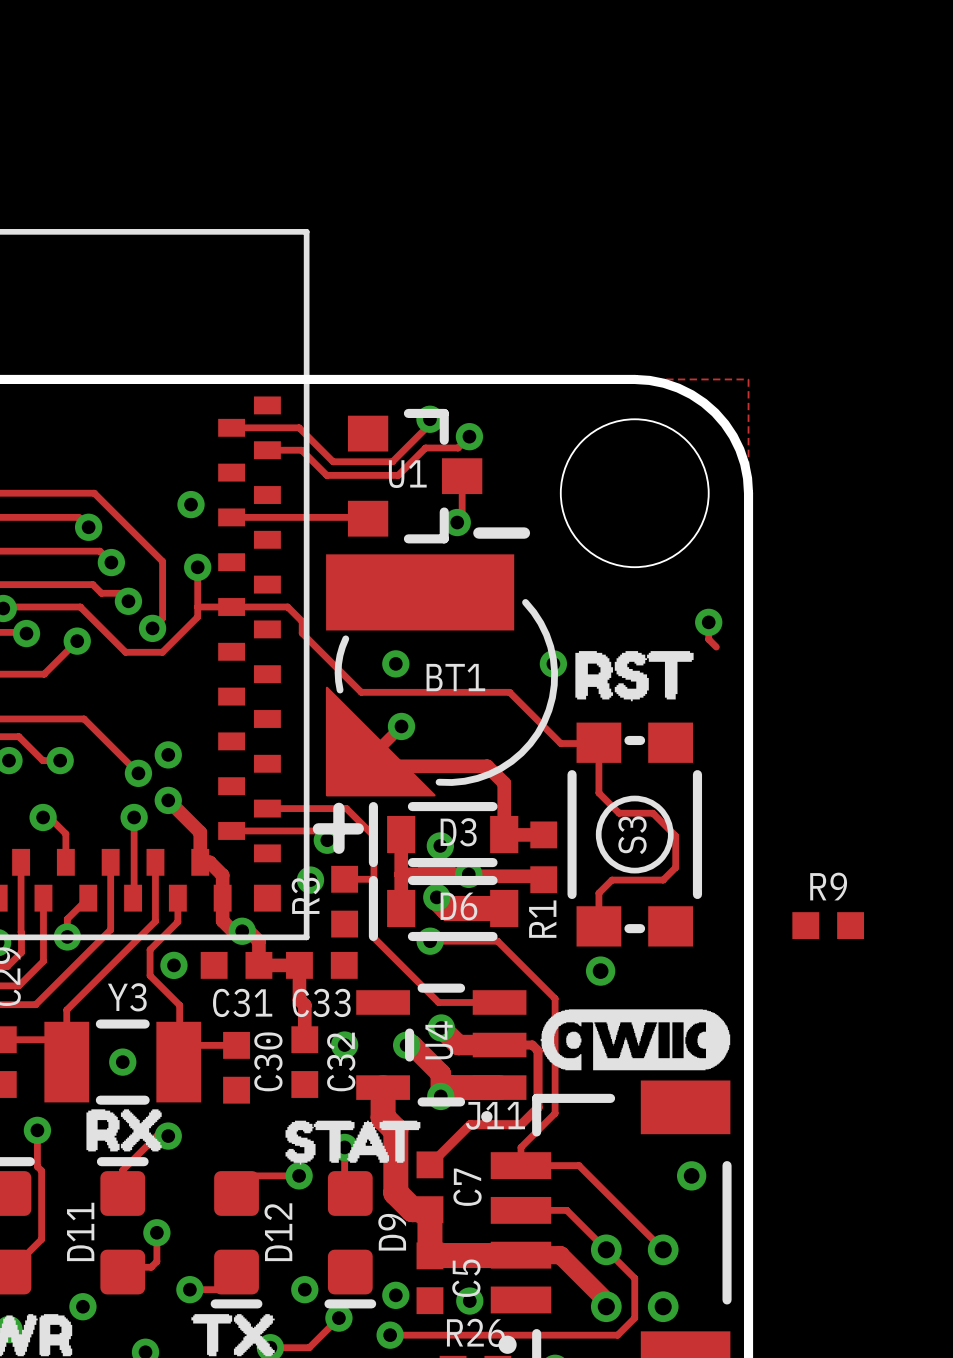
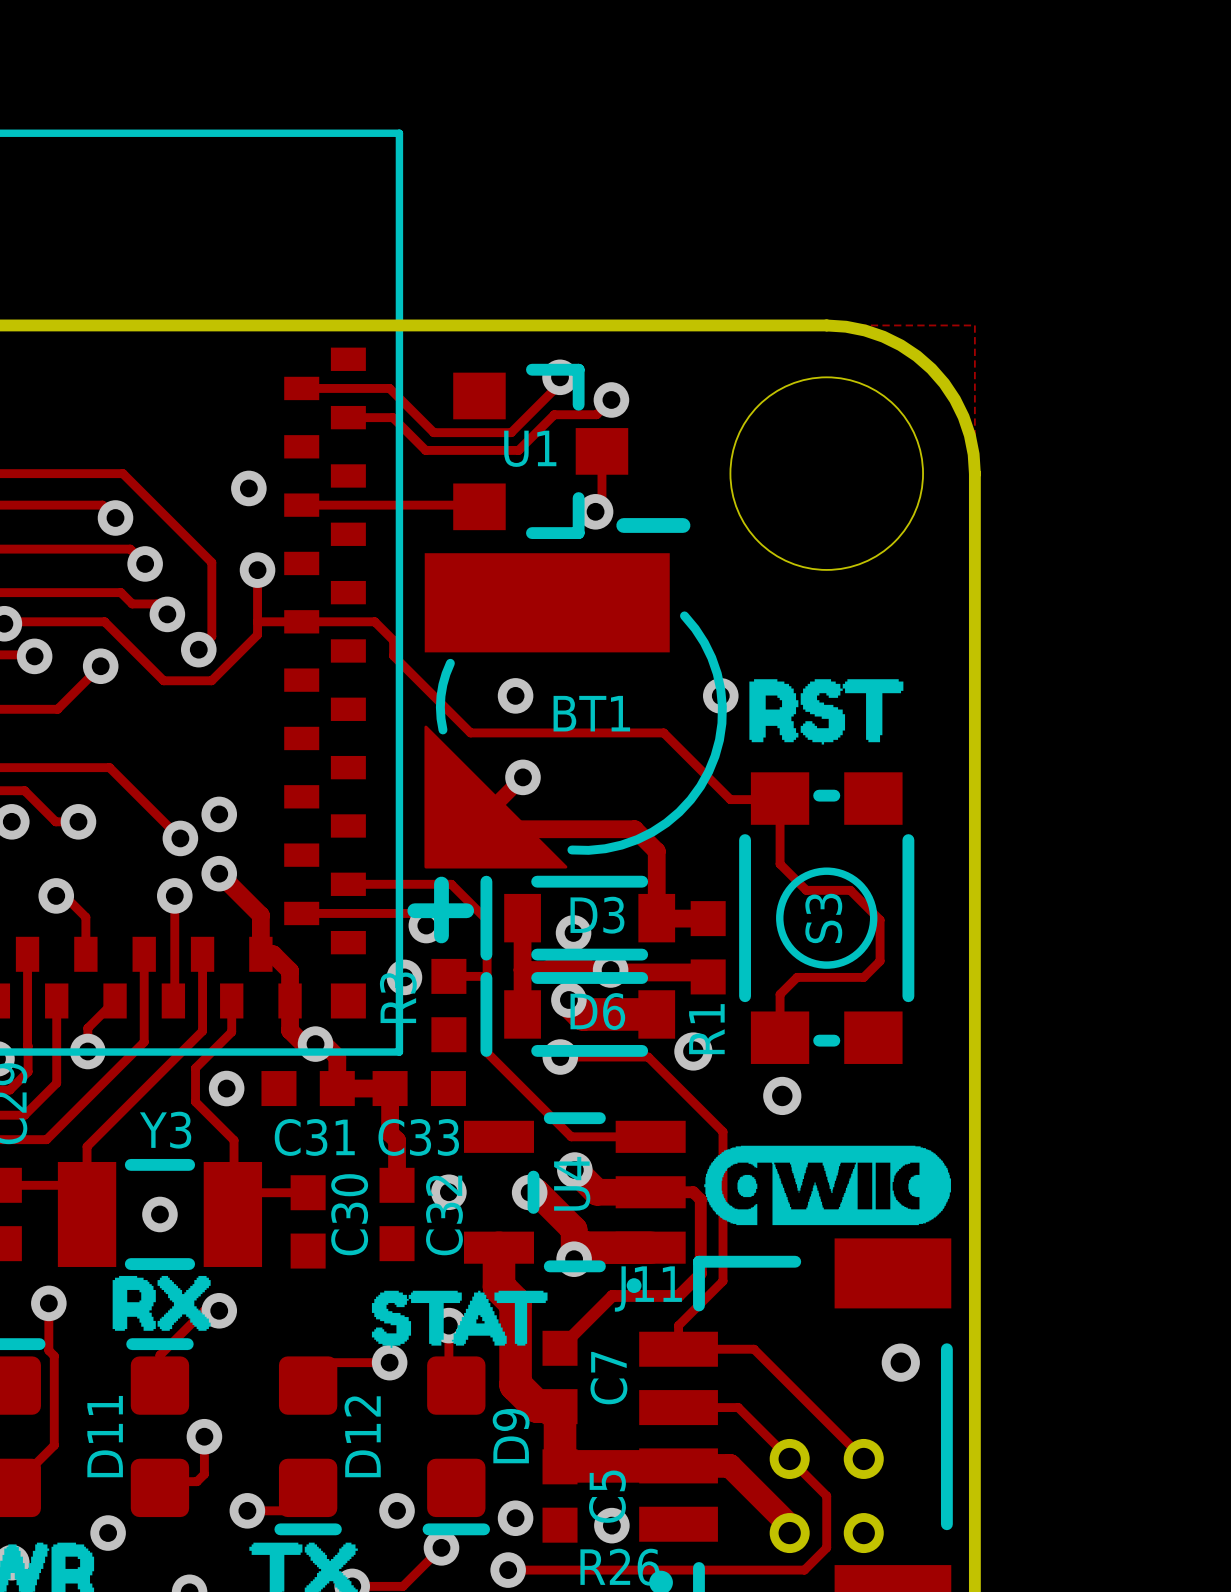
track: (708, 622) (708, 639) (716, 647) -> none
via: (708, 622) -> none
R9: (828, 925) -> none
via: none -> (693, 1051)

